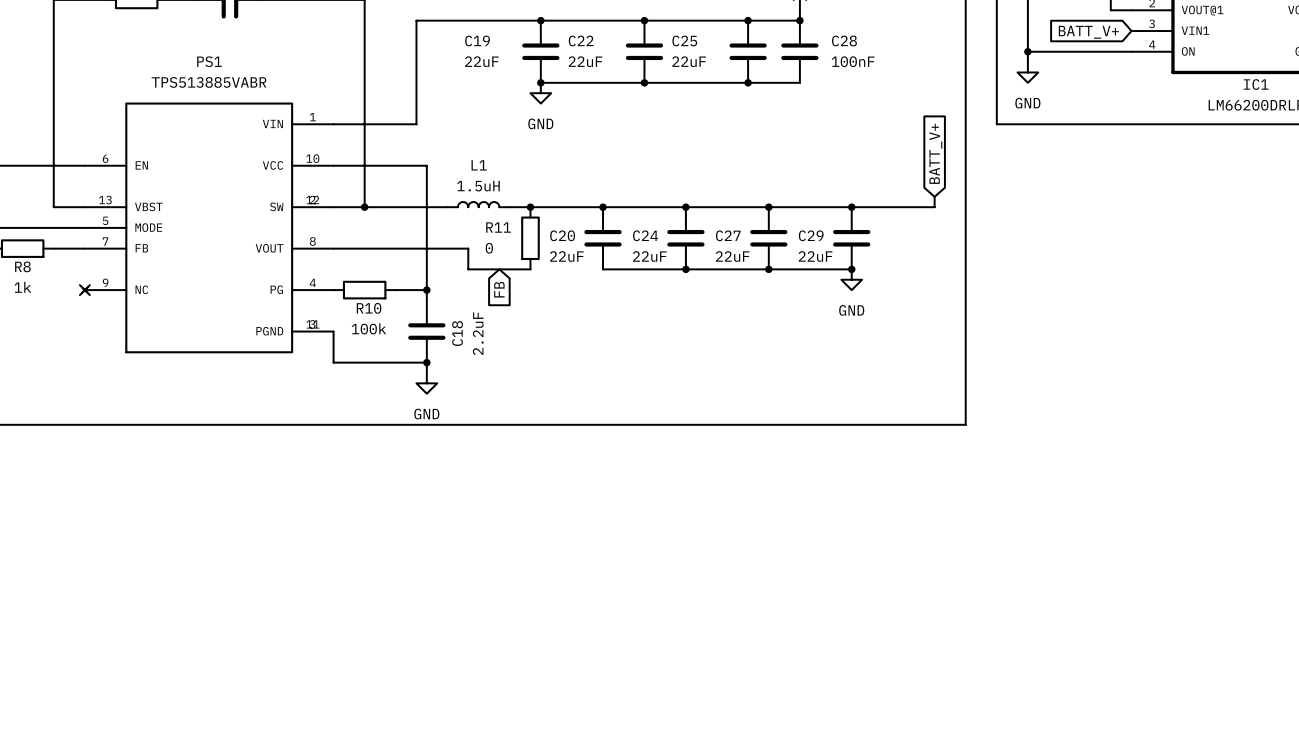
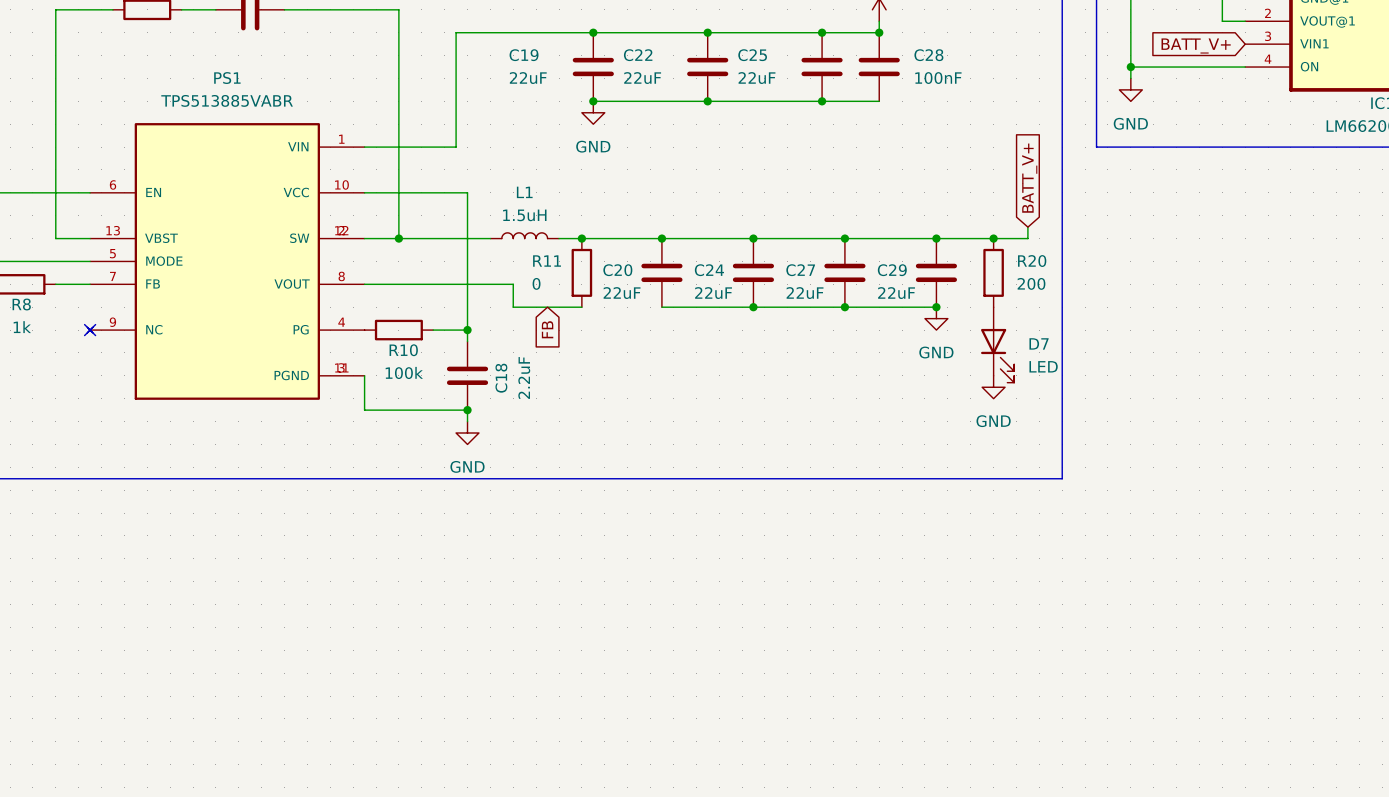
junction: none -> (993, 238)
R20: none -> 200 (993, 272)
D7: none -> LED (997, 344)
power symbol: none -> GND (993, 387)

